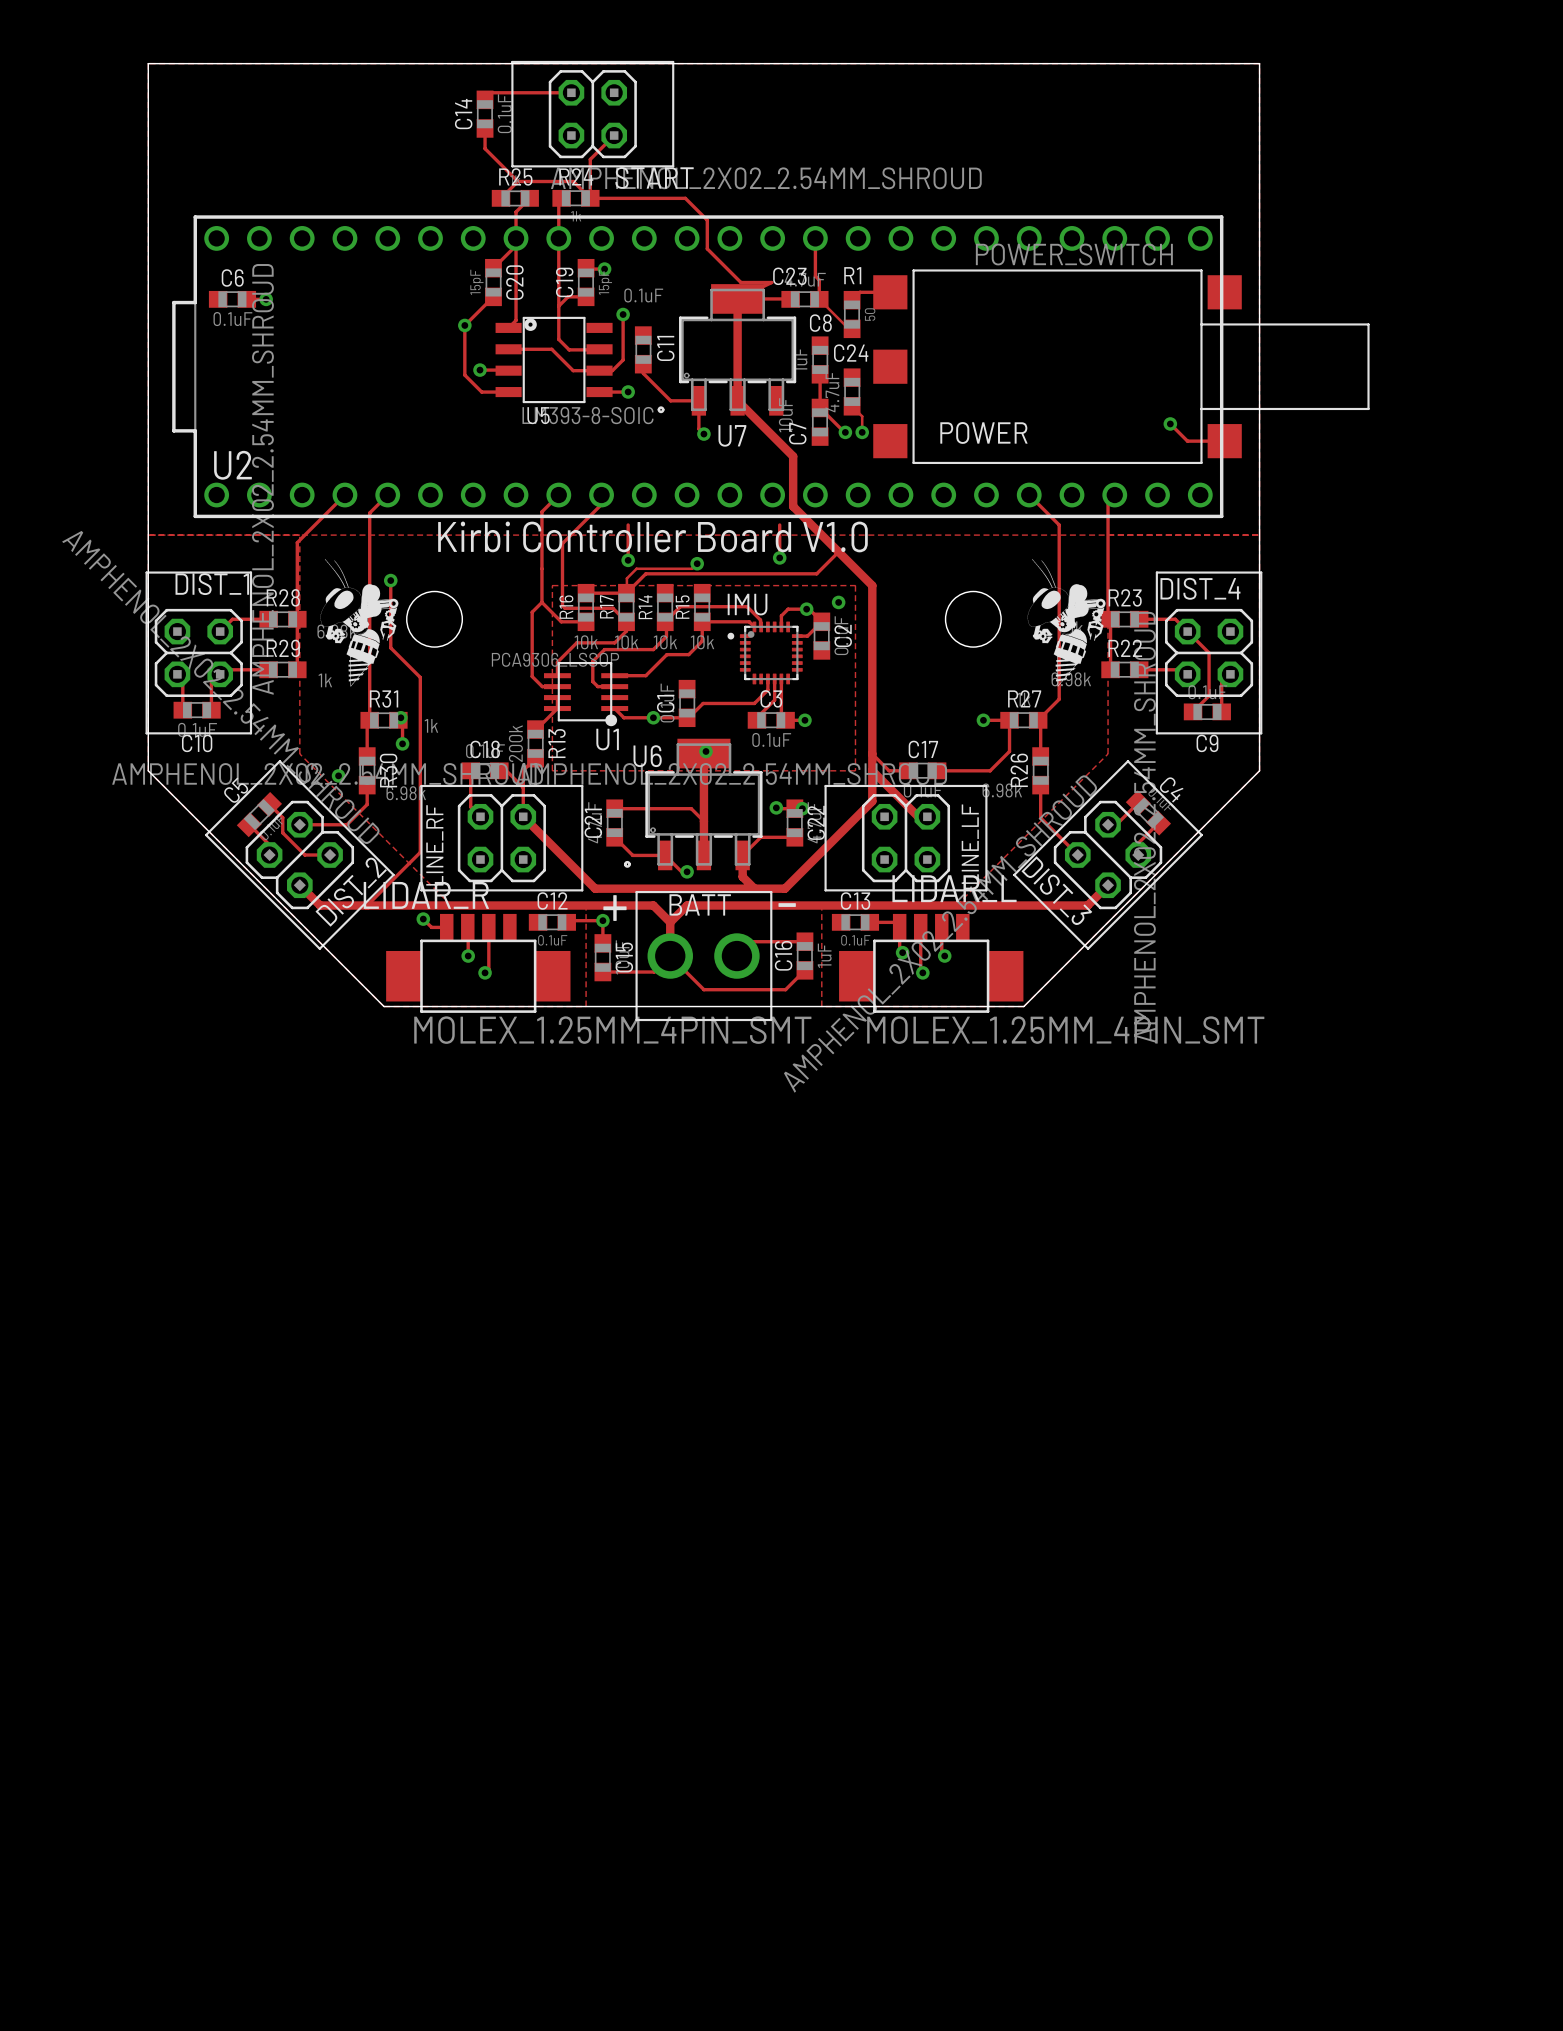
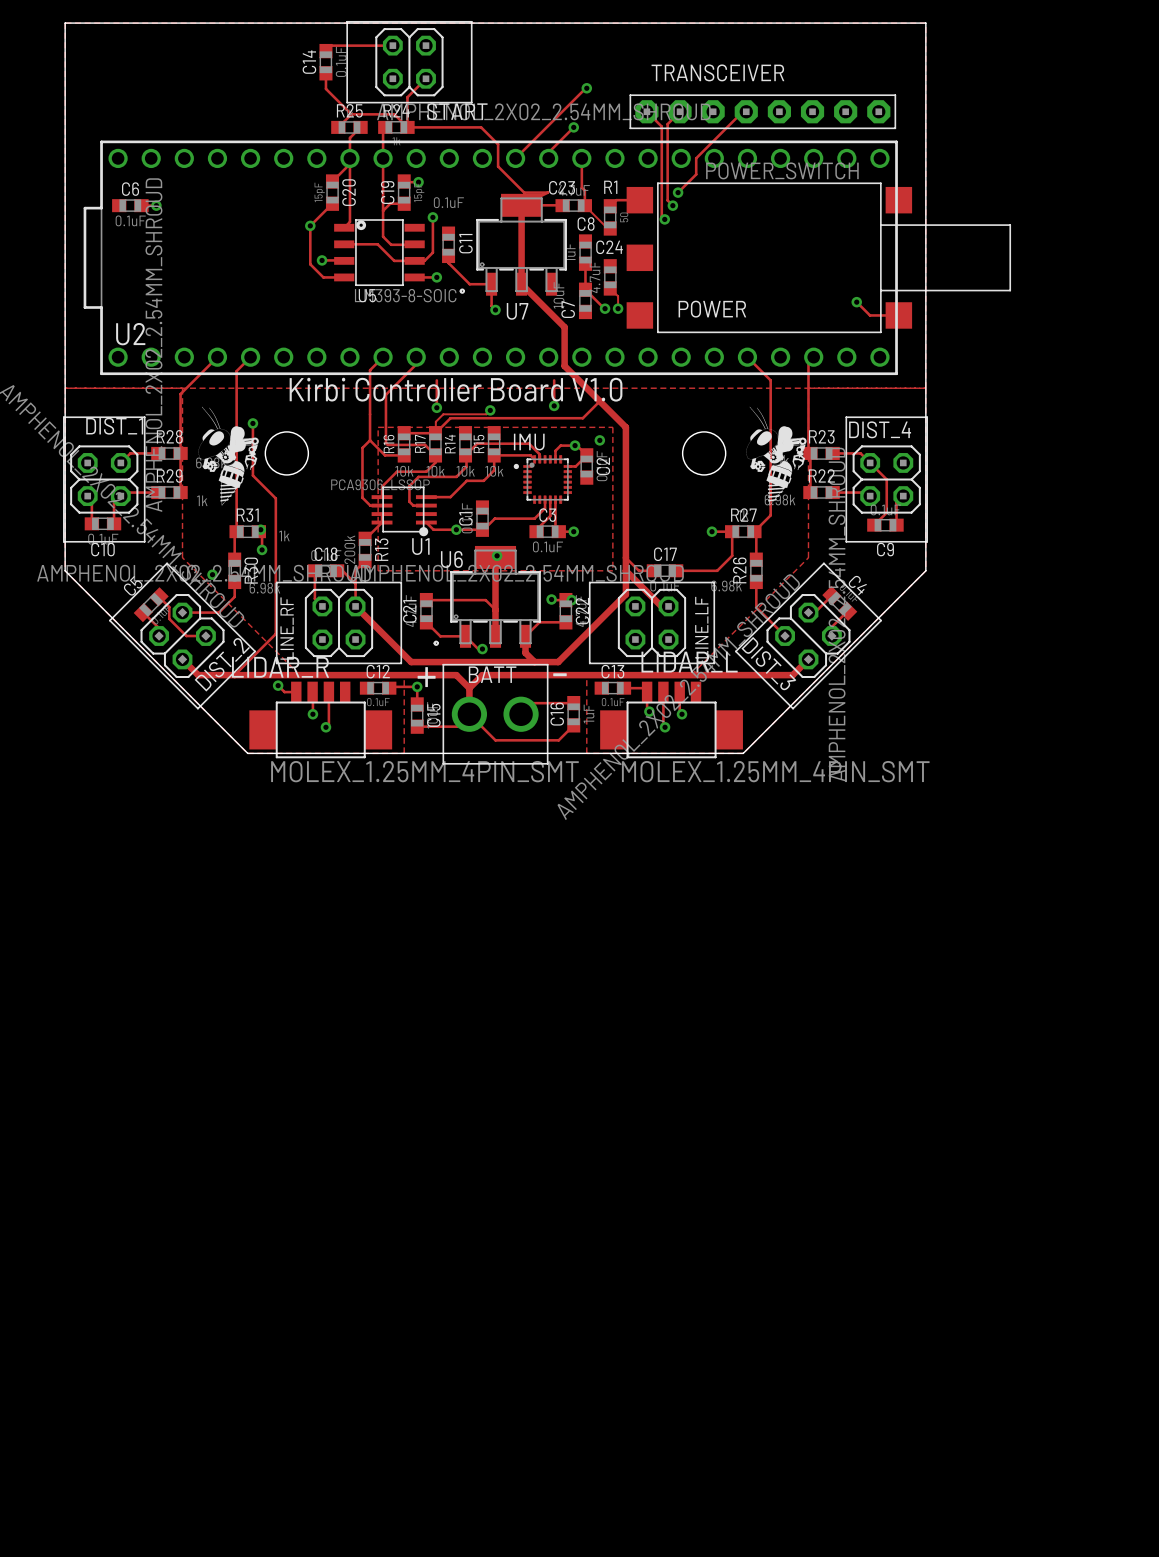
track: none -> (586, 88) (515, 158)
via: none -> (586, 88)
track: none -> (646, 111) (661, 126) (661, 216) (664, 219)
track: none -> (680, 111) (667, 124) (667, 200) (672, 205)
track: none -> (746, 111) (742, 111) (696, 158) (696, 174) (678, 192)
TRANSCEIVER: none -> (762, 111)
track: none -> (573, 127) (548, 152) (548, 158)
via: none -> (573, 127)
via: none -> (678, 192)
via: none -> (672, 205)
via: none -> (664, 219)

